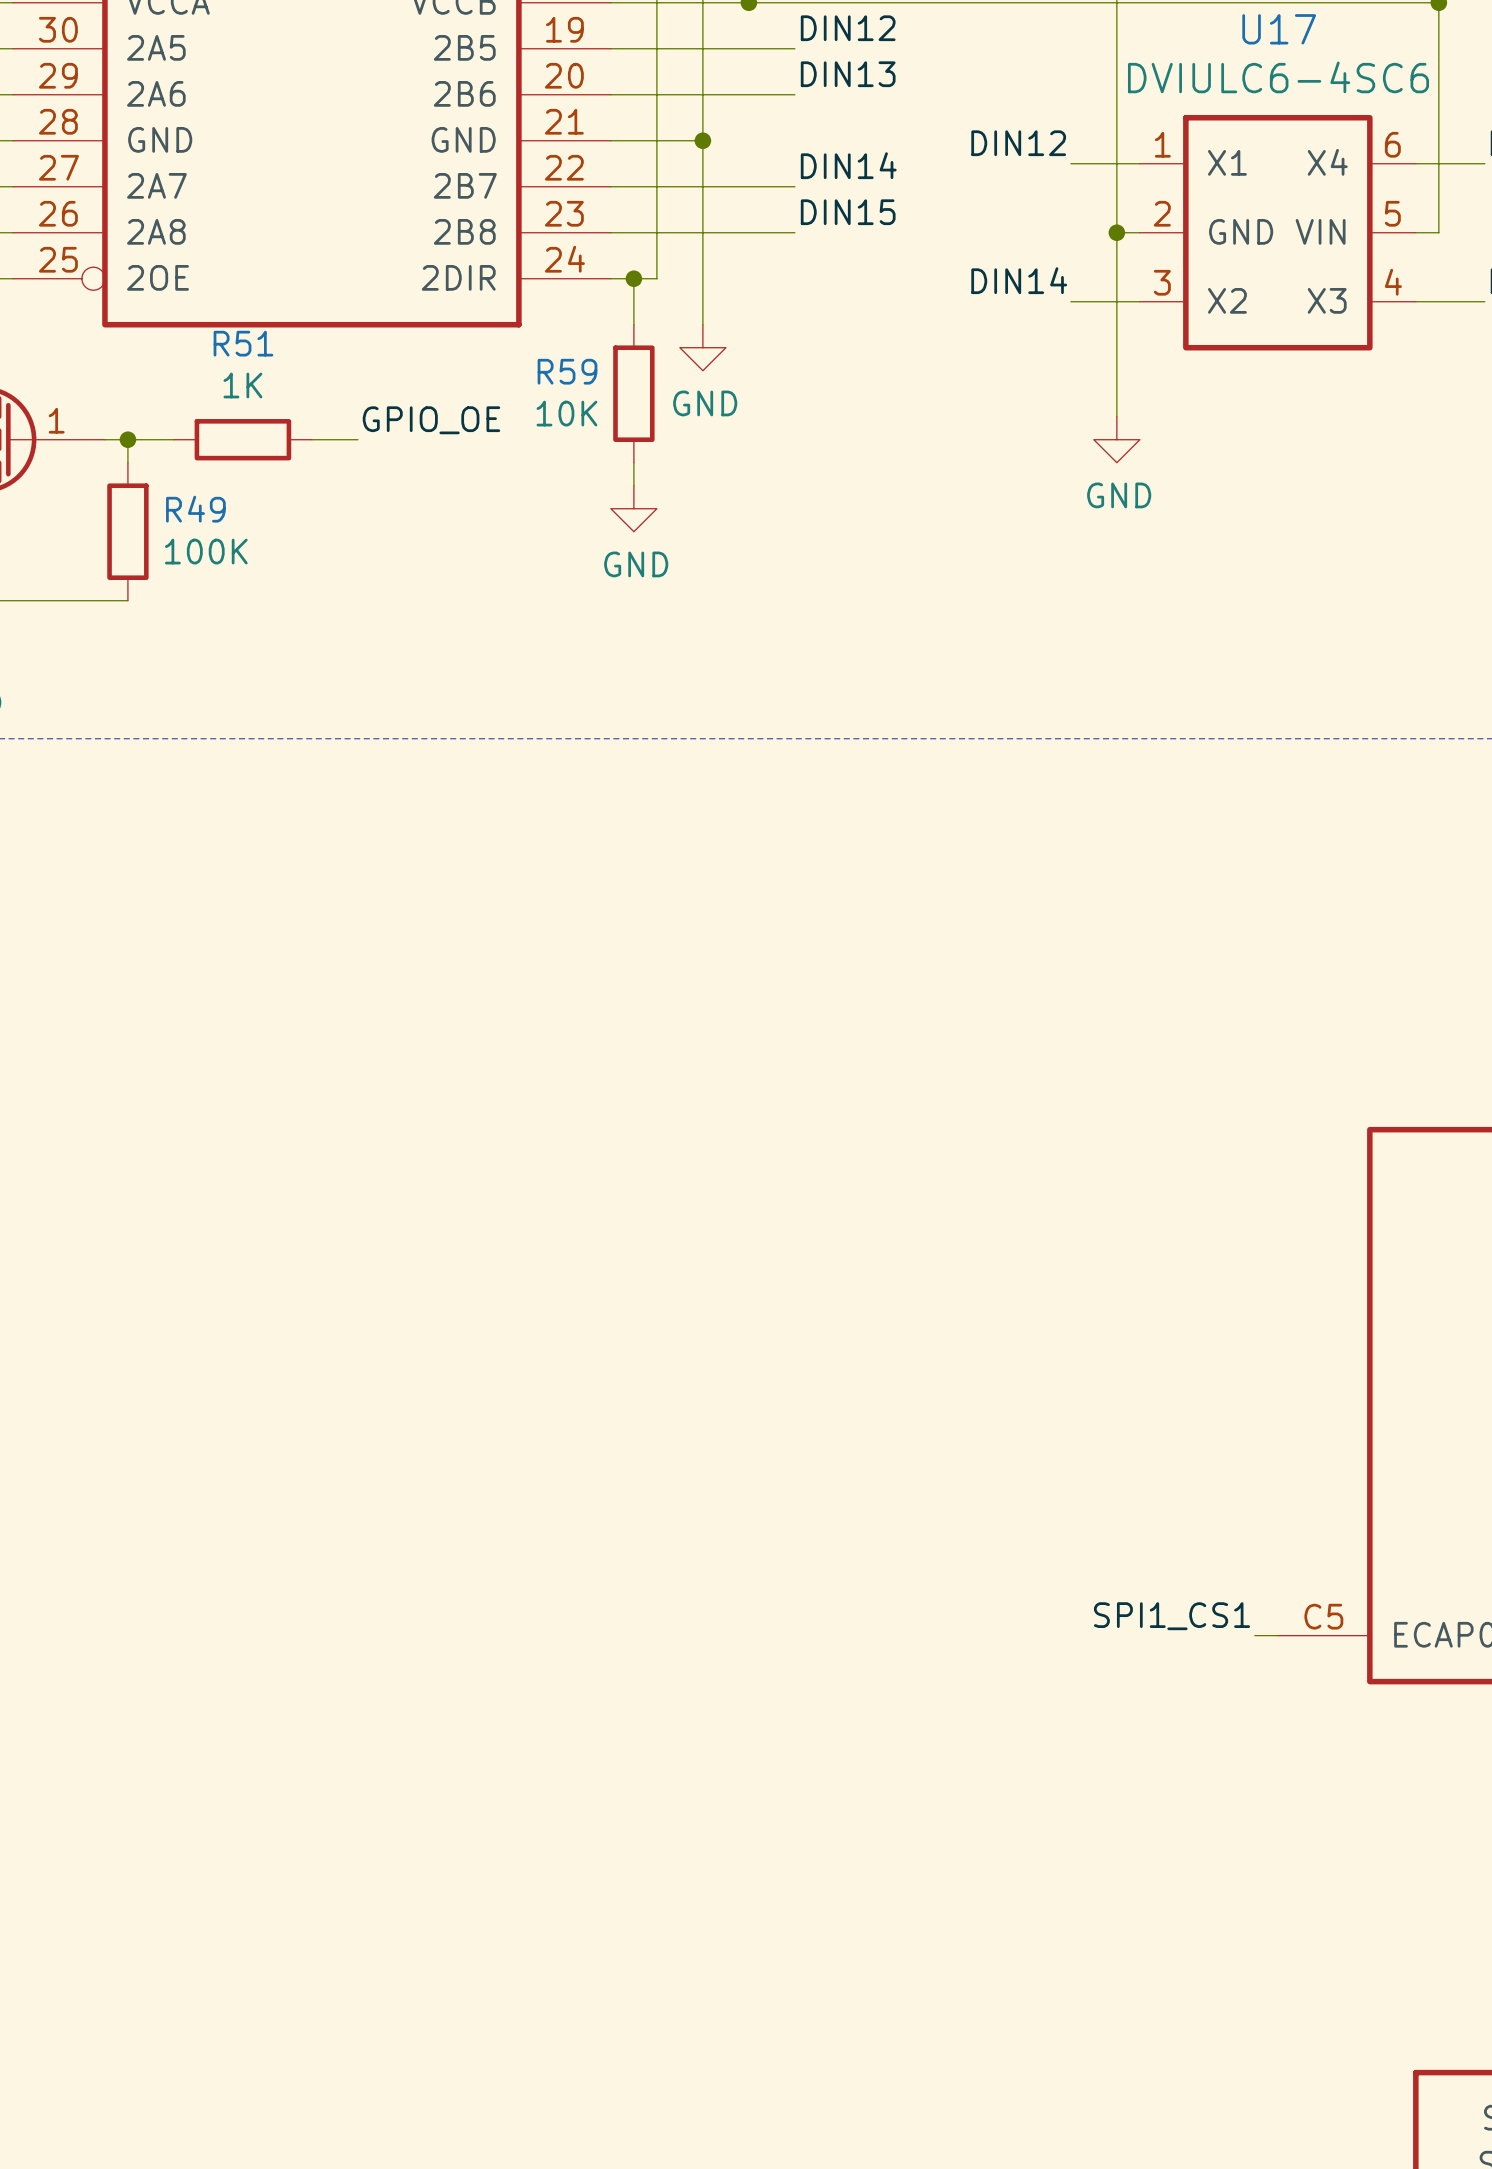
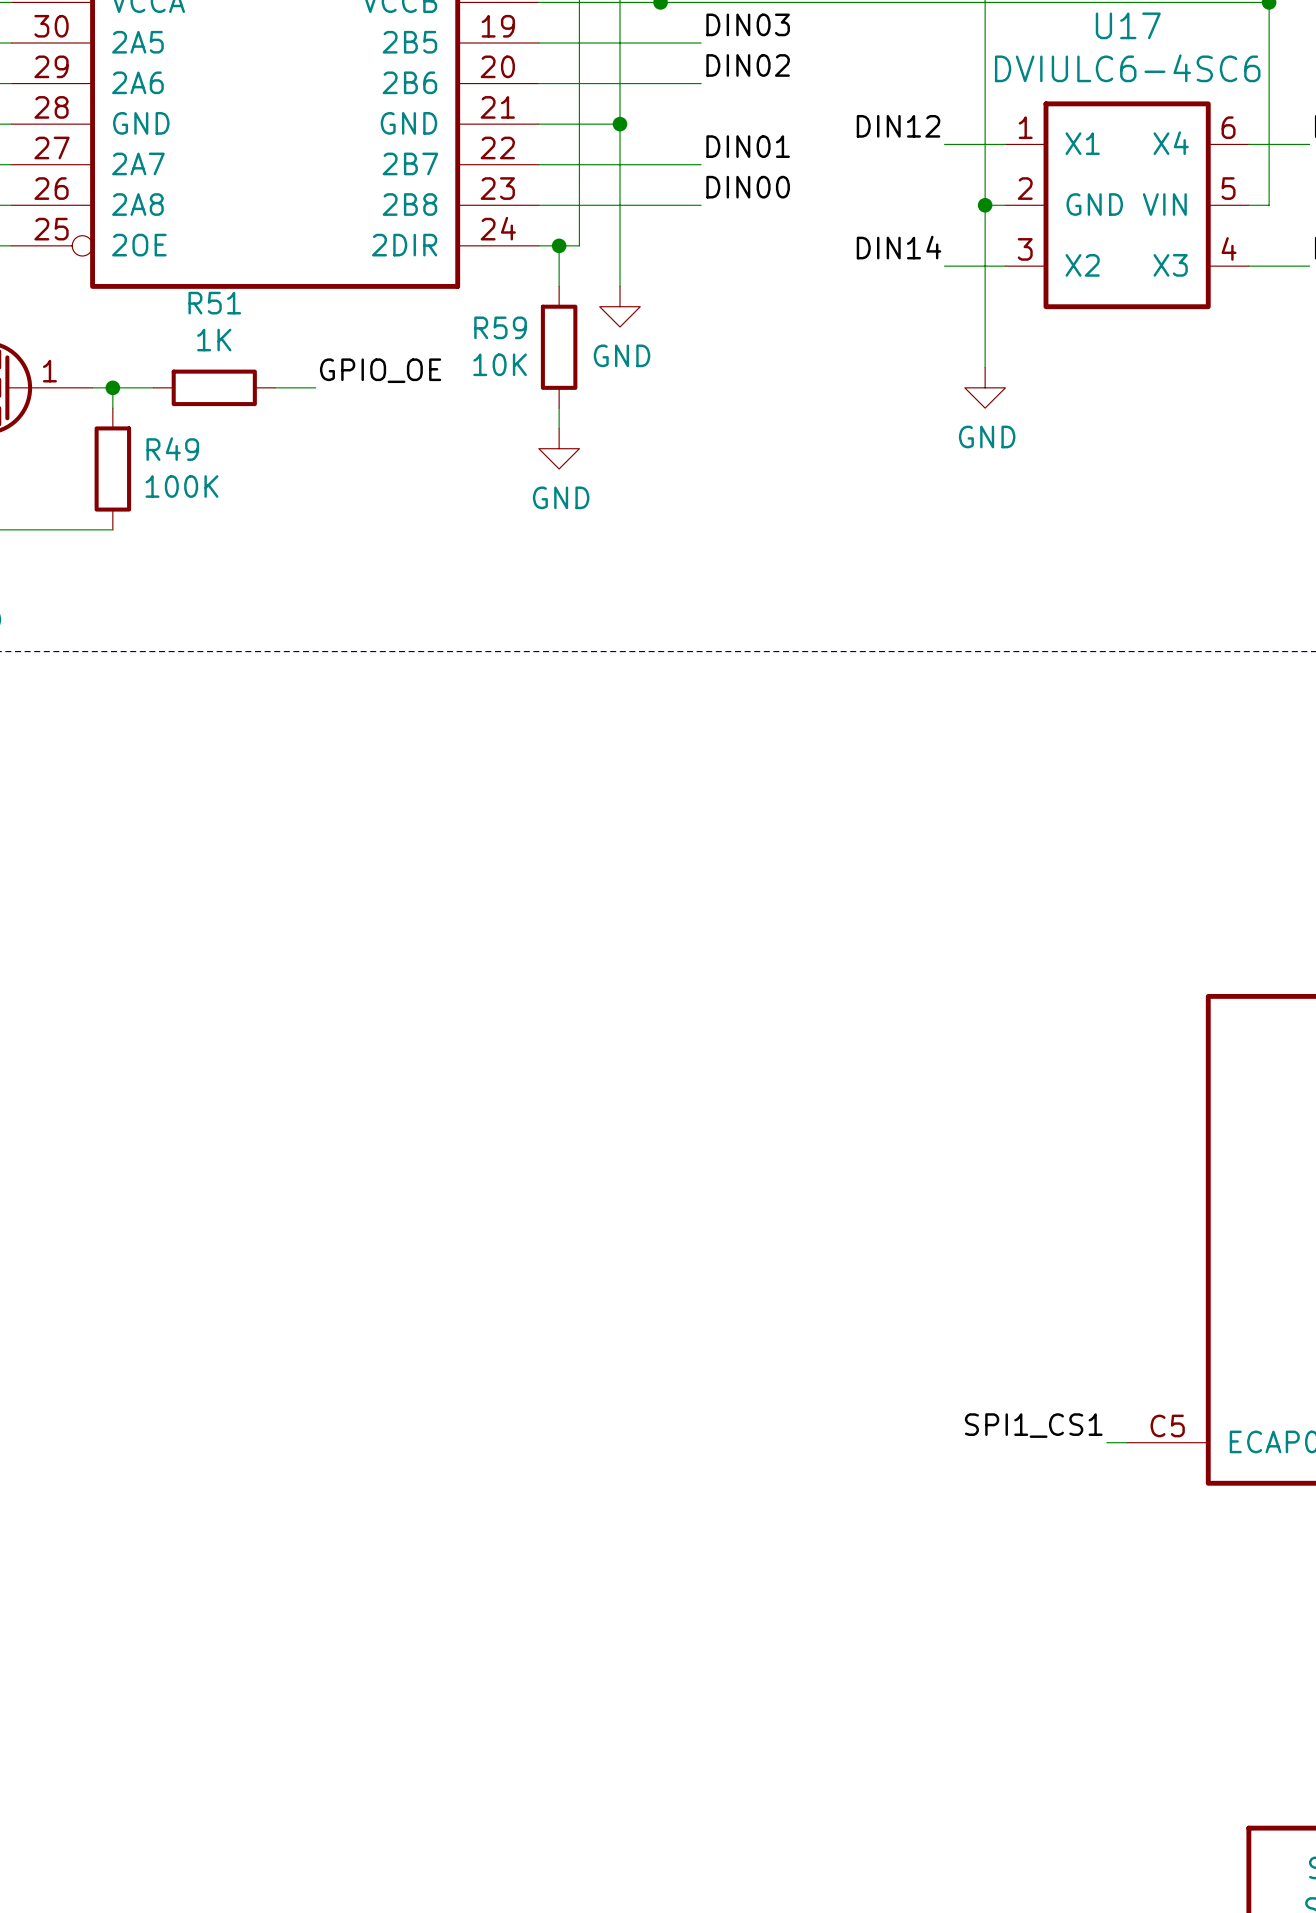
label: DIN12 (848, 28) -> DIN03 (748, 24)
label: DIN13 (848, 74) -> DIN02 (748, 65)
label: DIN14 (848, 165) -> DIN01 (748, 146)
label: DIN15 (848, 212) -> DIN00 (748, 187)

